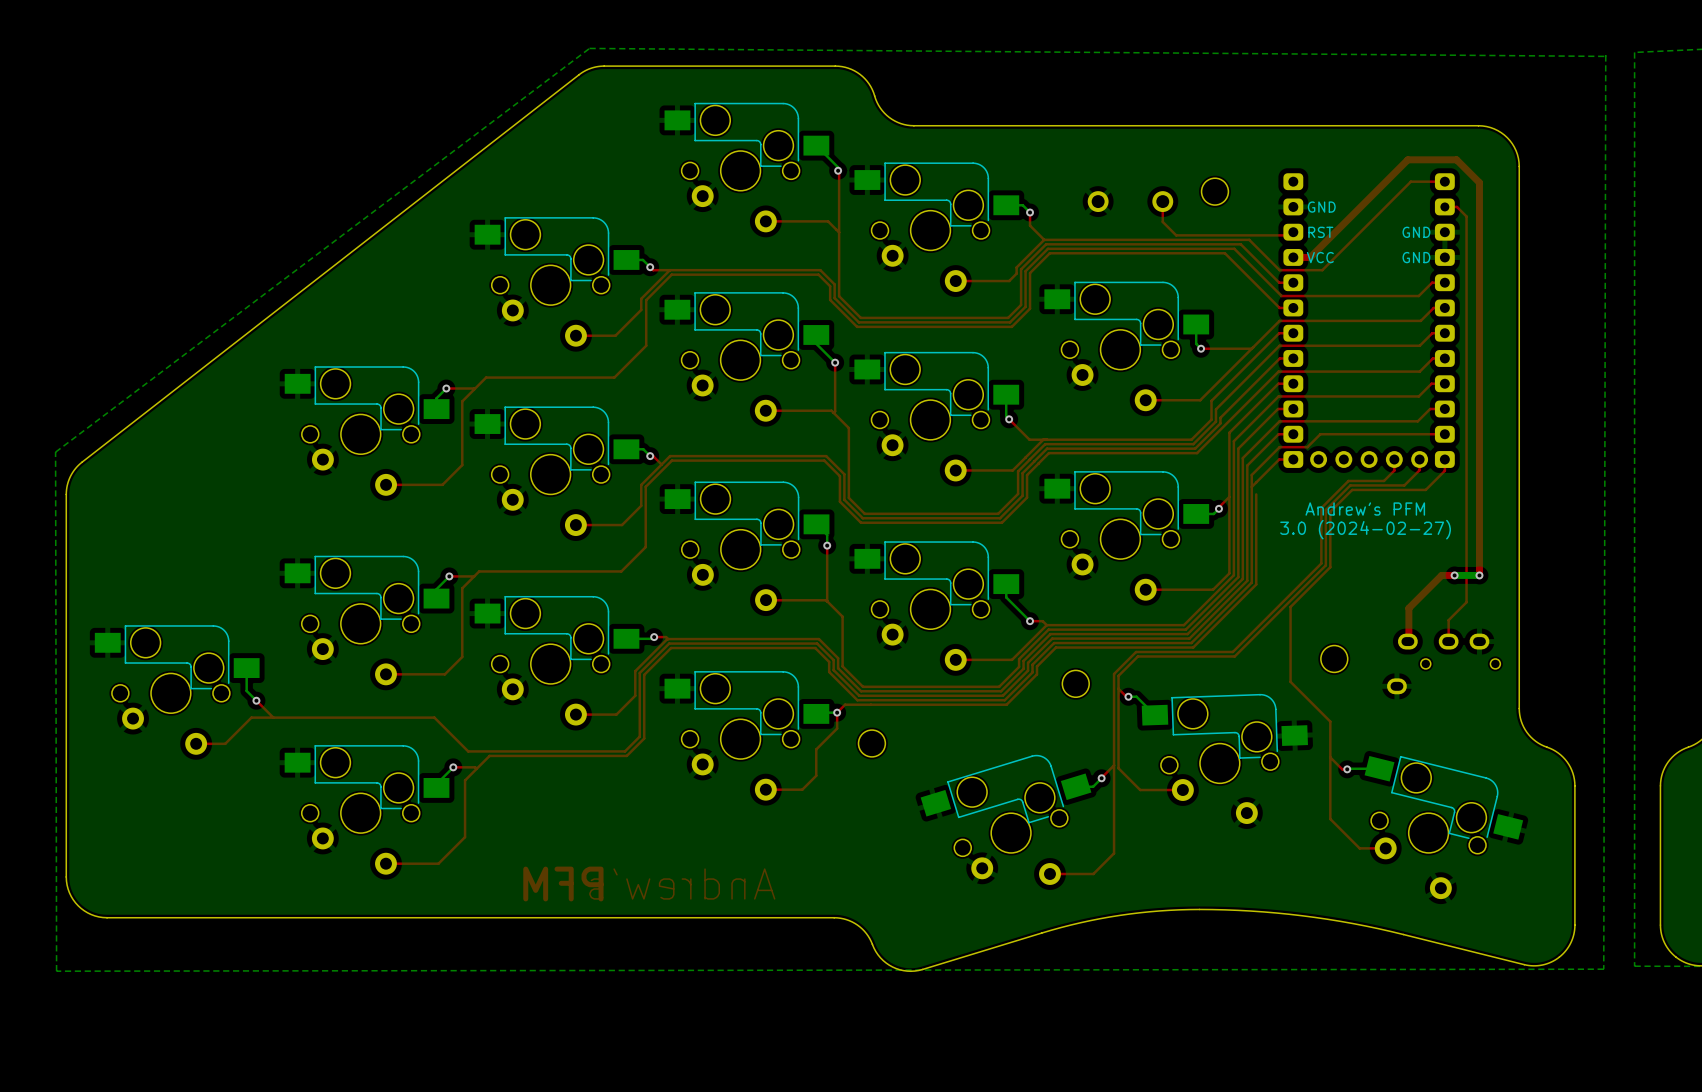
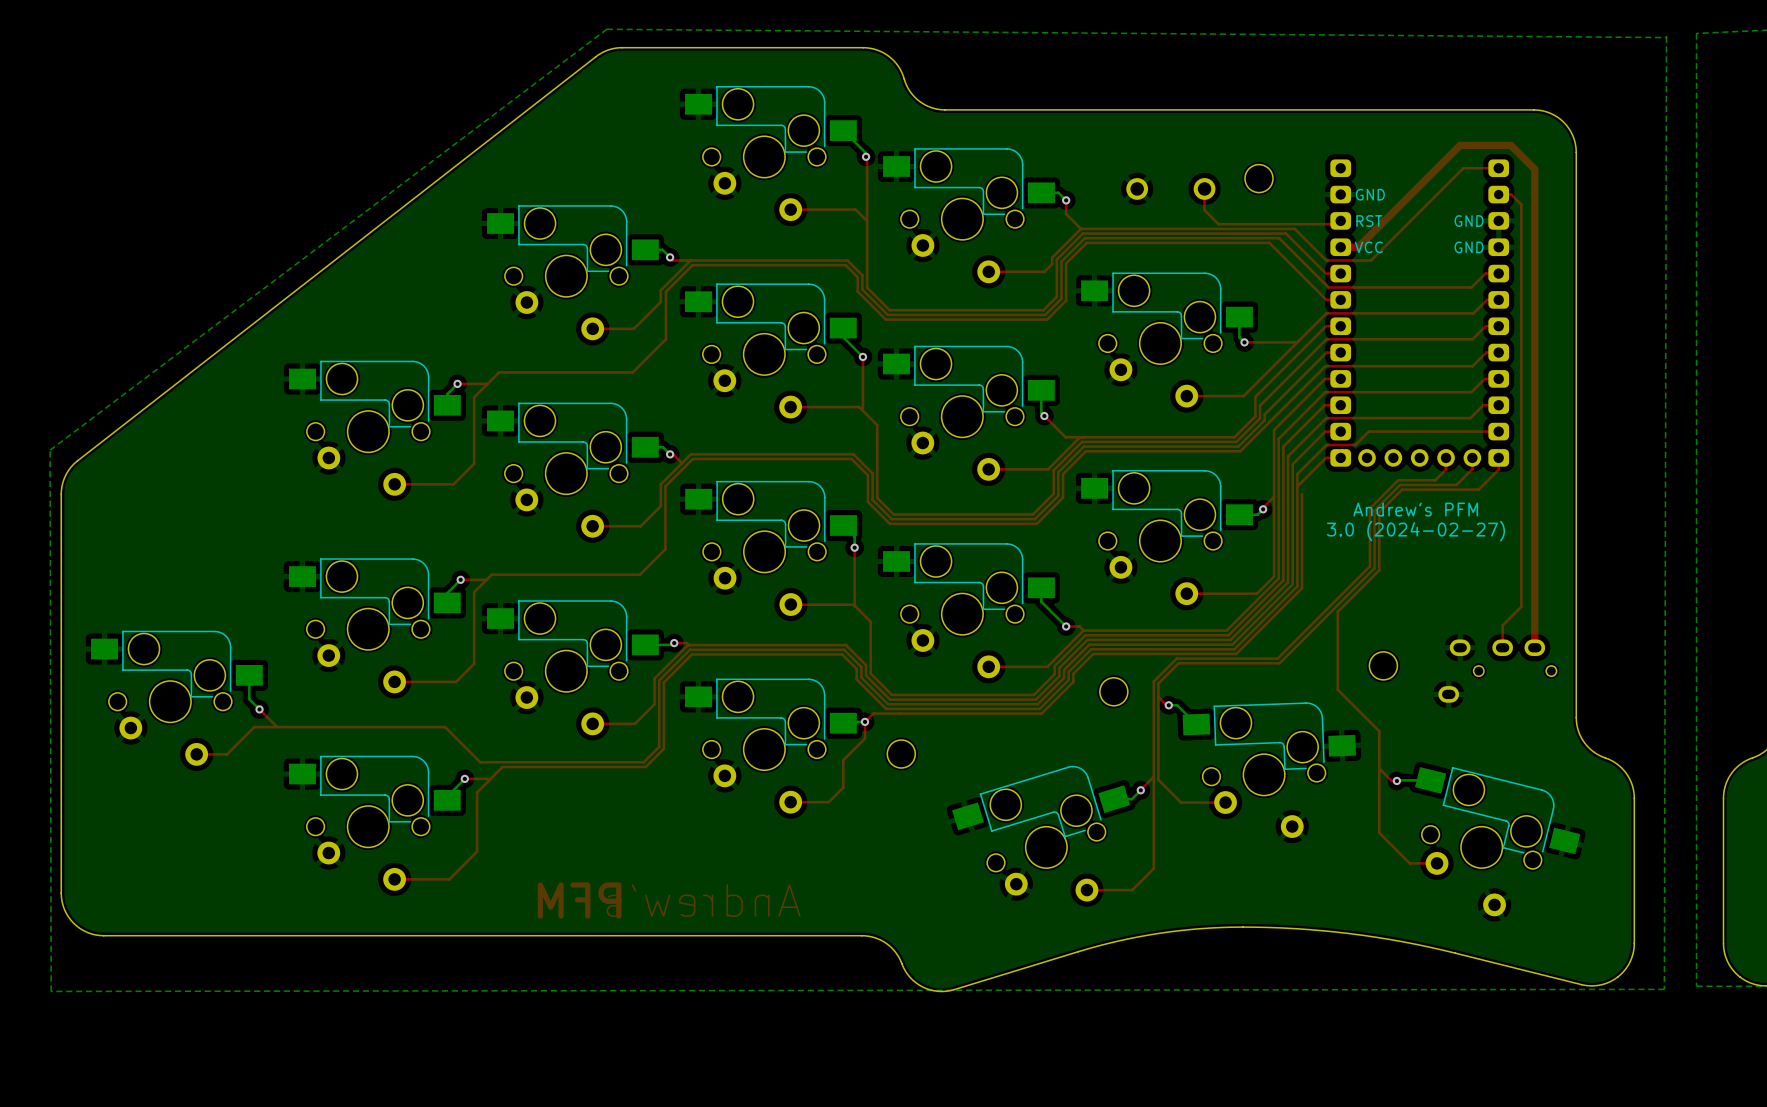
top track: (1454, 575) (1441, 575) (1408, 608) (1407, 641) -> none
via: (1454, 575) -> none
top track: none -> (1534, 578) (1534, 647)
bottom track: (1479, 575) (1454, 575) -> none
via: (1479, 575) -> none

